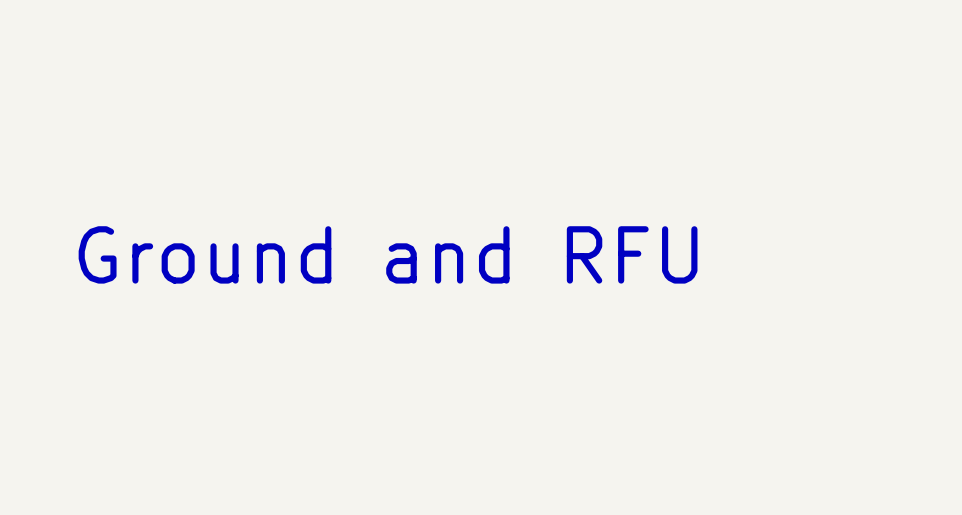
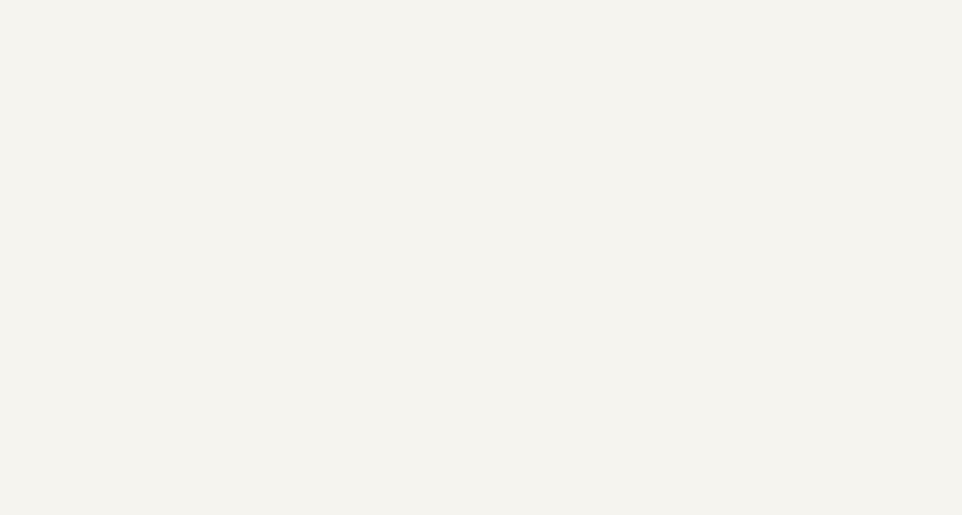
text: Ground and RFU (388, 254) -> none

